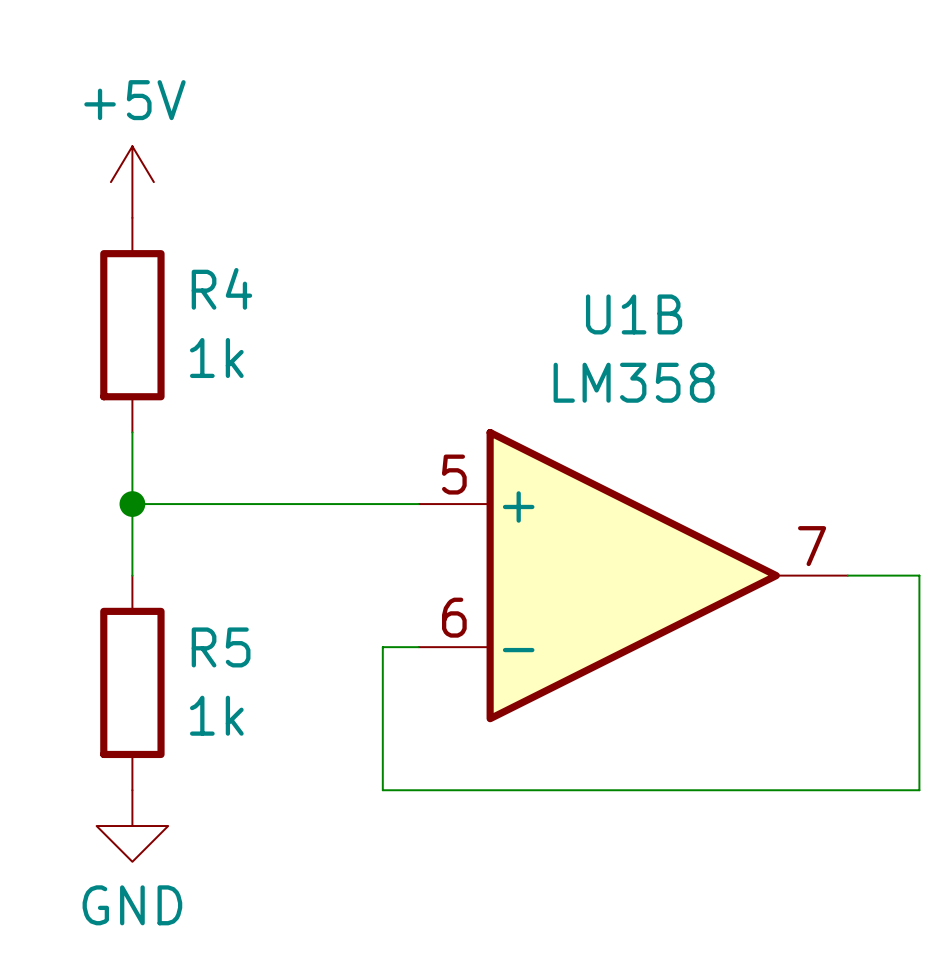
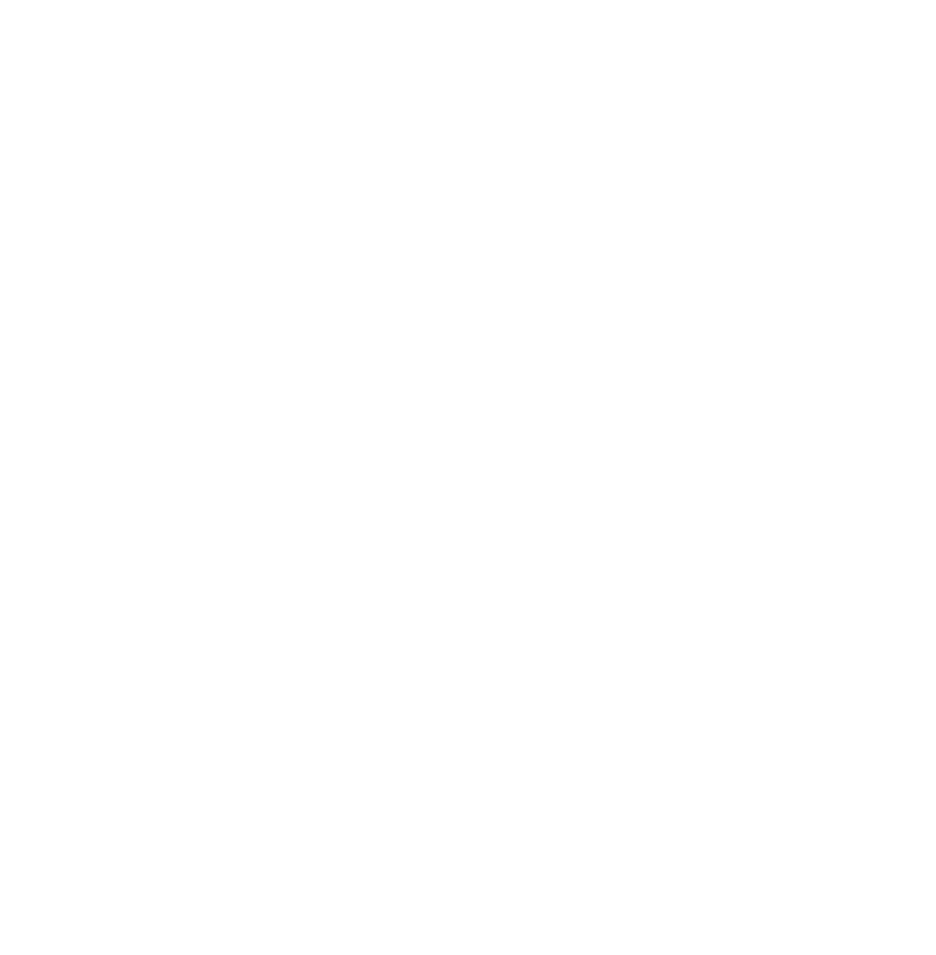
power symbol: +5V (132, 182) -> none
R4: 1k (132, 325) -> none
wire: (132, 432) (132, 575) -> none
wire: (132, 504) (418, 504) -> none
junction: (132, 504) -> none
U1B: LM358 (633, 575) -> none
wire: (847, 575) (919, 575) (919, 790) (382, 790) (382, 647) (418, 647) -> none
R5: 1k (132, 682) -> none
power symbol: GND (132, 826) -> none

